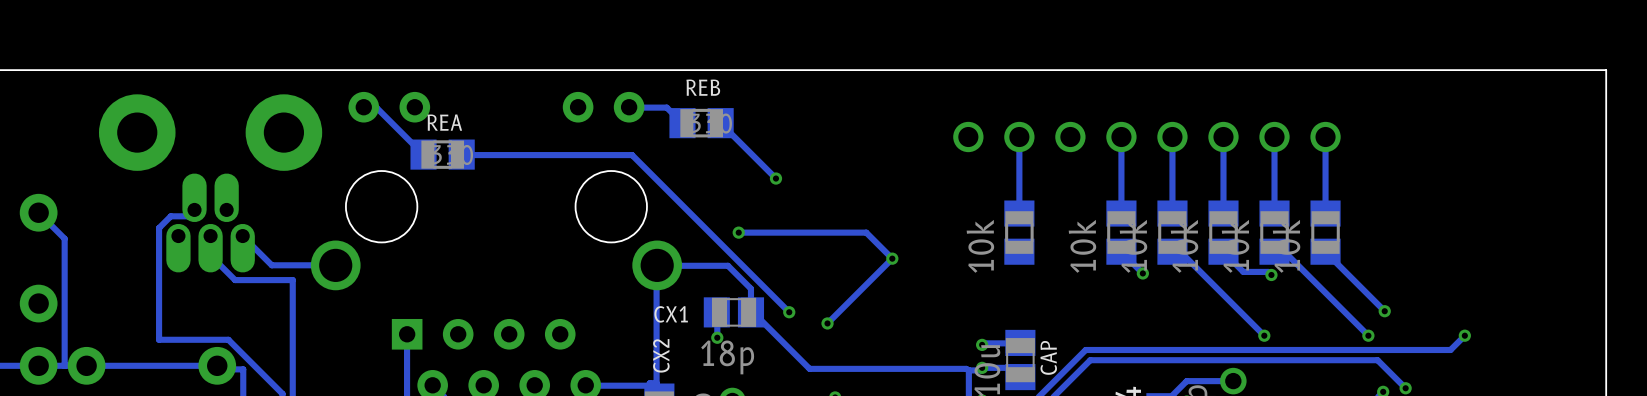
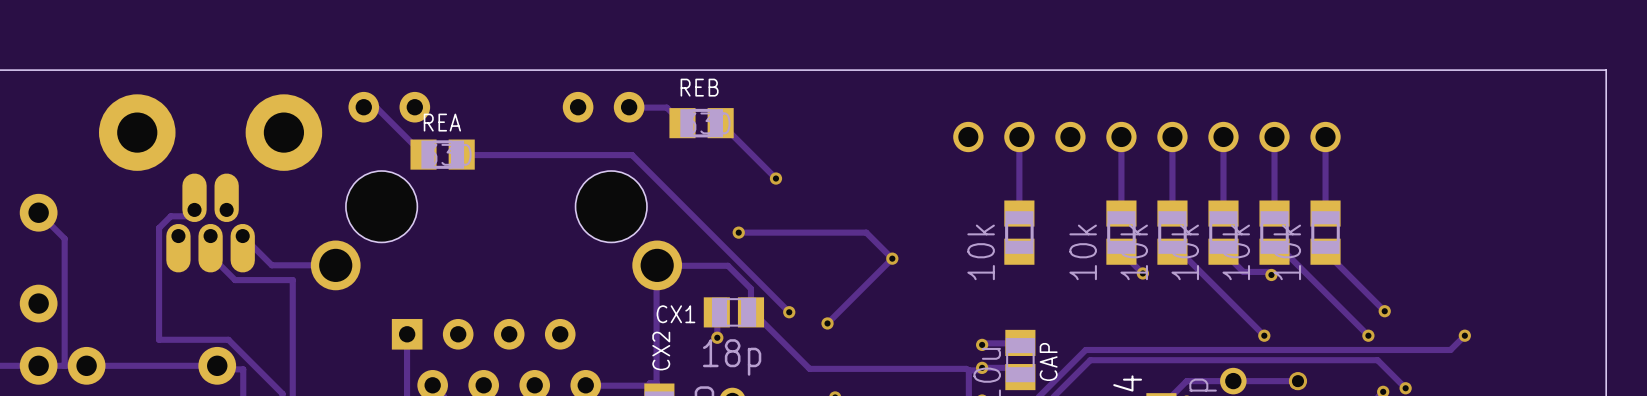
track: none -> (1297, 381) (1233, 381)
via: none -> (1297, 381)

